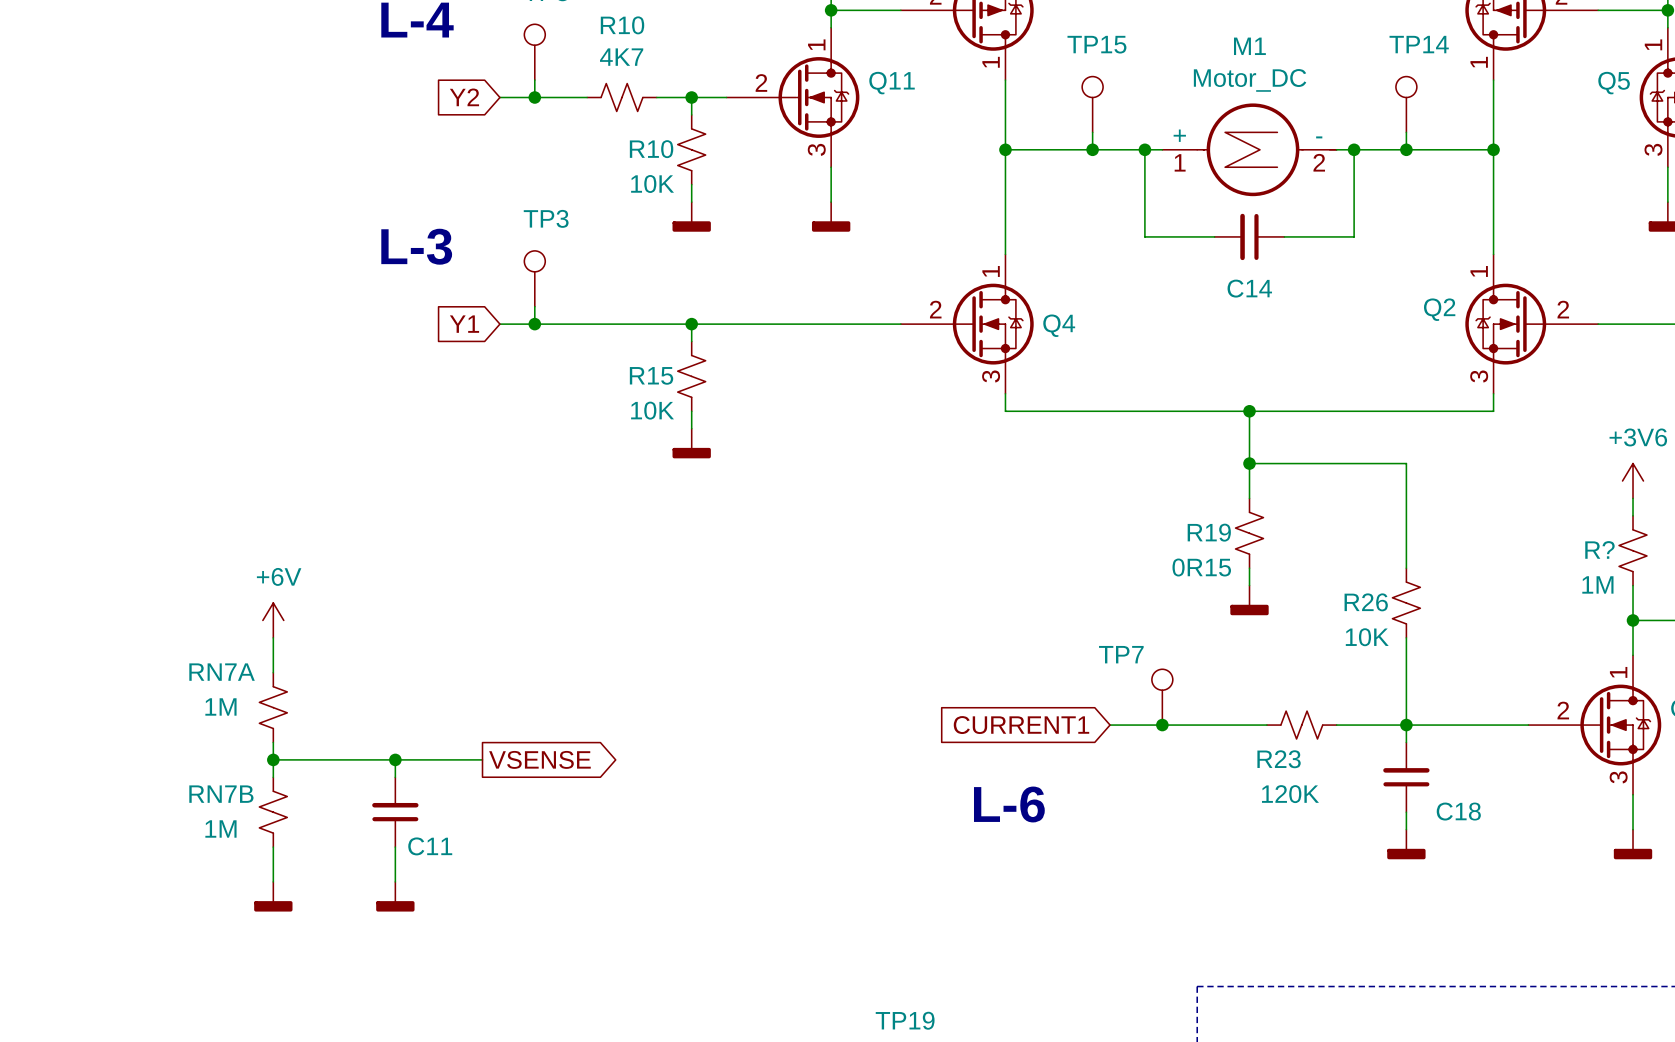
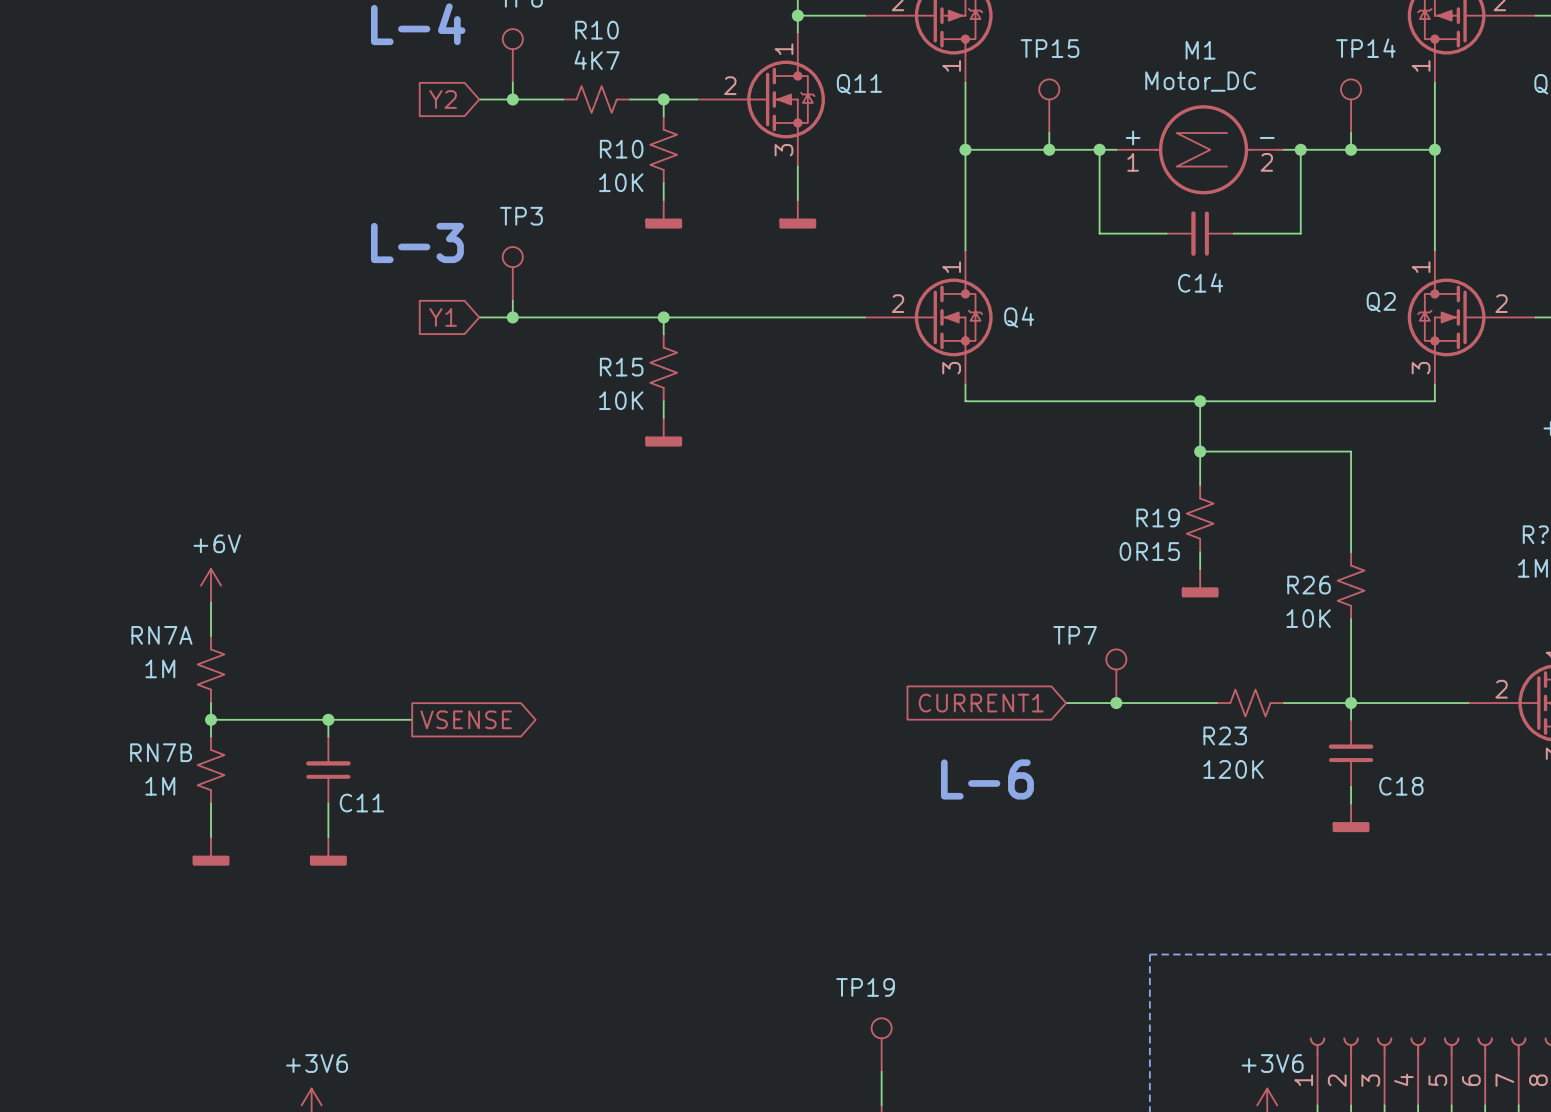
power symbol position: +6V (273, 620) -> +6V (211, 585)
wire: (273, 637) (273, 672) -> (211, 602) (211, 635)
RN7A position: (273, 707) -> (211, 669)
junction: none -> (211, 719)
wire: (273, 742) (273, 777) -> (211, 703) (211, 736)
junction: none -> (328, 719)
wire: (273, 759) (482, 759) -> (211, 719) (412, 719)
junction: (273, 759) -> none
wire: (395, 759) (395, 777) -> (328, 719) (328, 736)
junction: (395, 759) -> none
global label position: VSENSE (539, 759) -> VSENSE (466, 719)
RN7B position: (273, 812) -> (211, 770)
C11 position: (395, 812) -> (328, 770)
wire: (273, 847) (273, 881) -> (211, 803) (211, 837)
wire: (395, 847) (395, 881) -> (328, 803) (328, 837)
power symbol: none -> (211, 851)
power symbol: none -> (328, 851)
power symbol: (273, 896) -> none
power symbol: (395, 896) -> none

